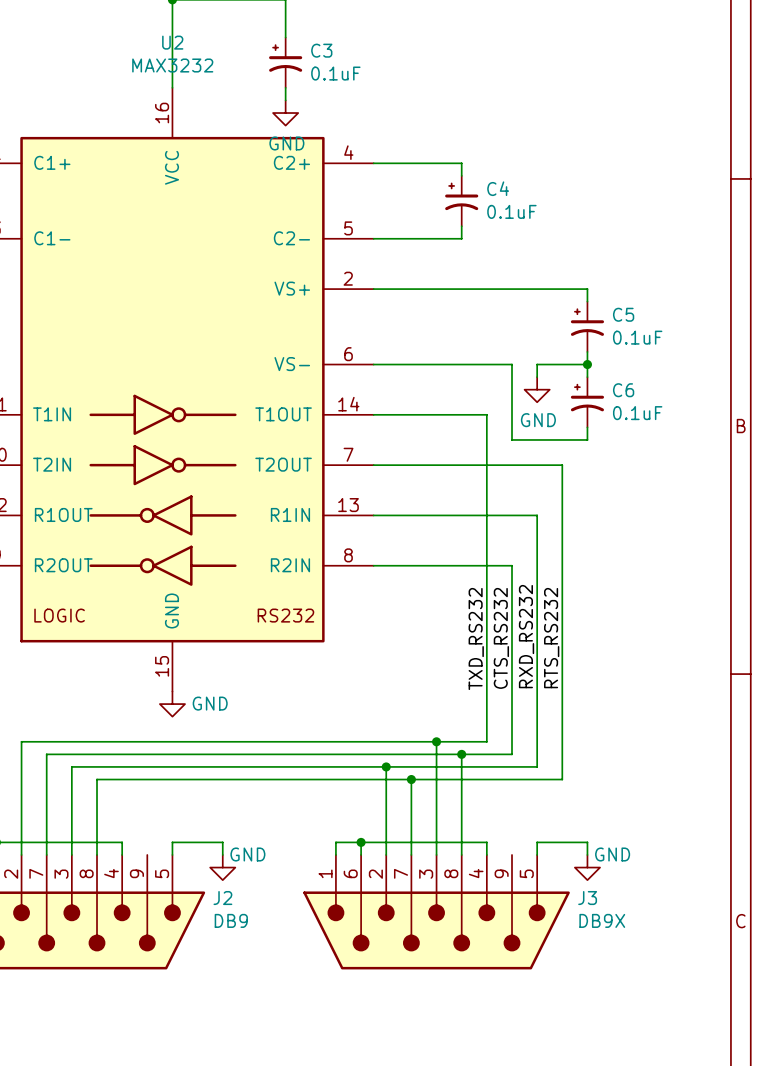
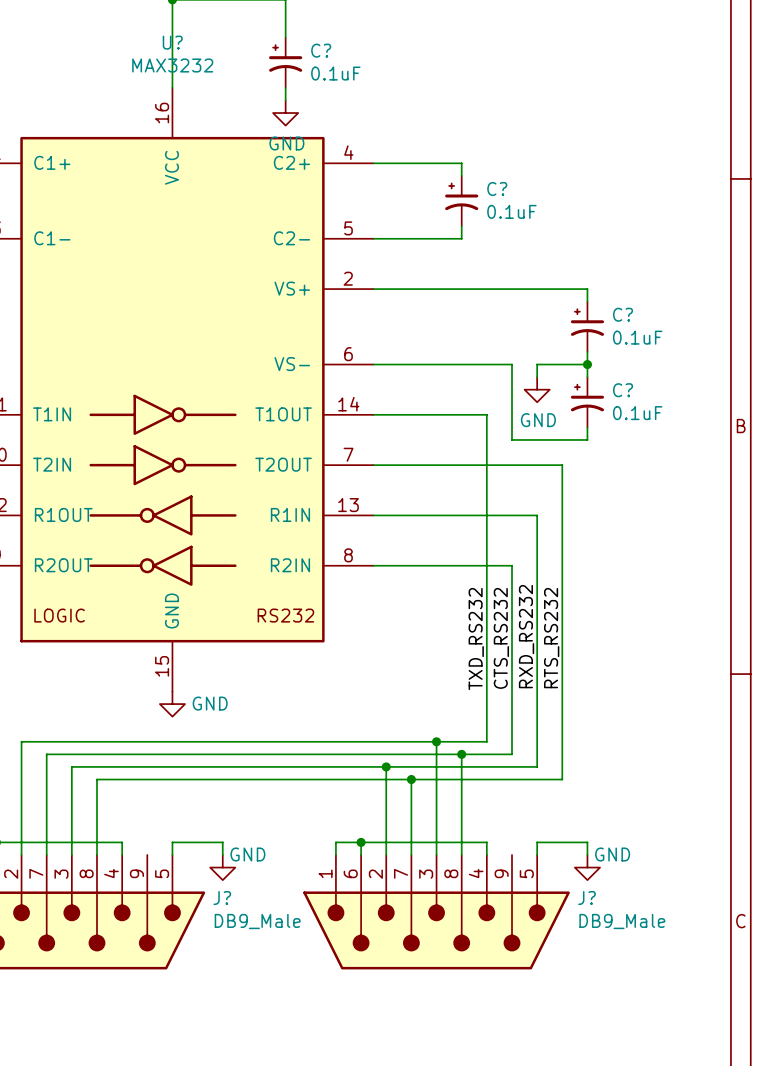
U2 name: U2 (172, 42) -> U? (172, 42)
C3 name: C3 (321, 50) -> C? (321, 50)
C4 name: C4 (498, 188) -> C? (497, 189)
C5 name: C5 (623, 314) -> C? (623, 314)
C6 name: C6 (623, 390) -> C? (623, 390)
J2 name: J2 (222, 898) -> J? (222, 898)
J3 name: J3 (587, 898) -> J? (587, 898)
J2 value: DB9 (231, 920) -> DB9_Male (257, 921)
J3 value: DB9X (602, 920) -> DB9_Male (622, 921)

